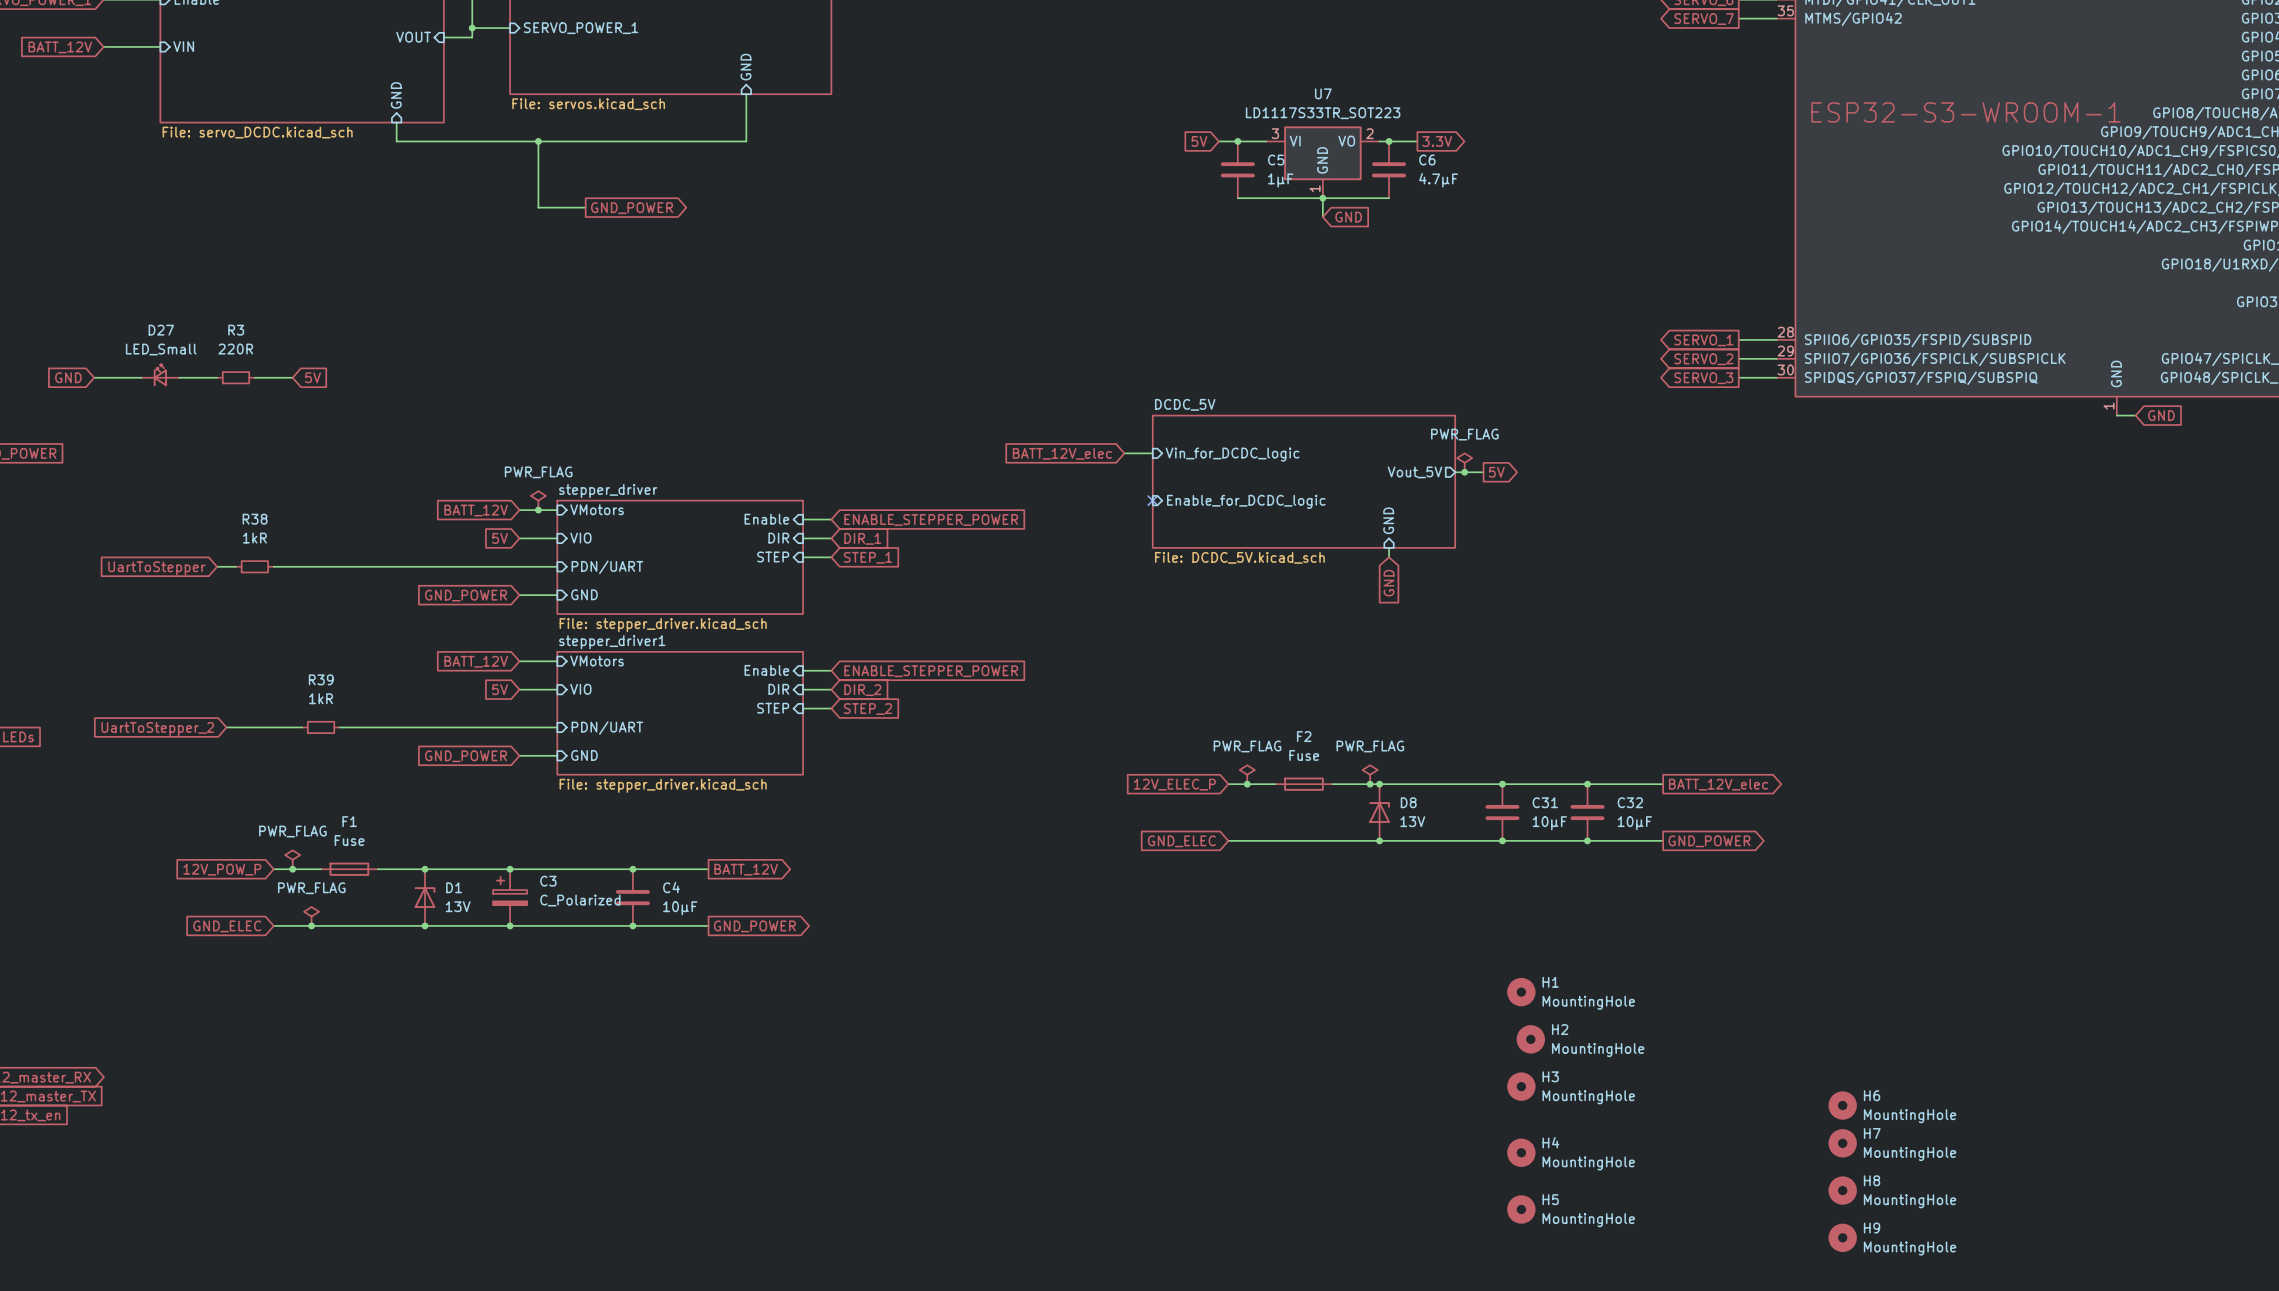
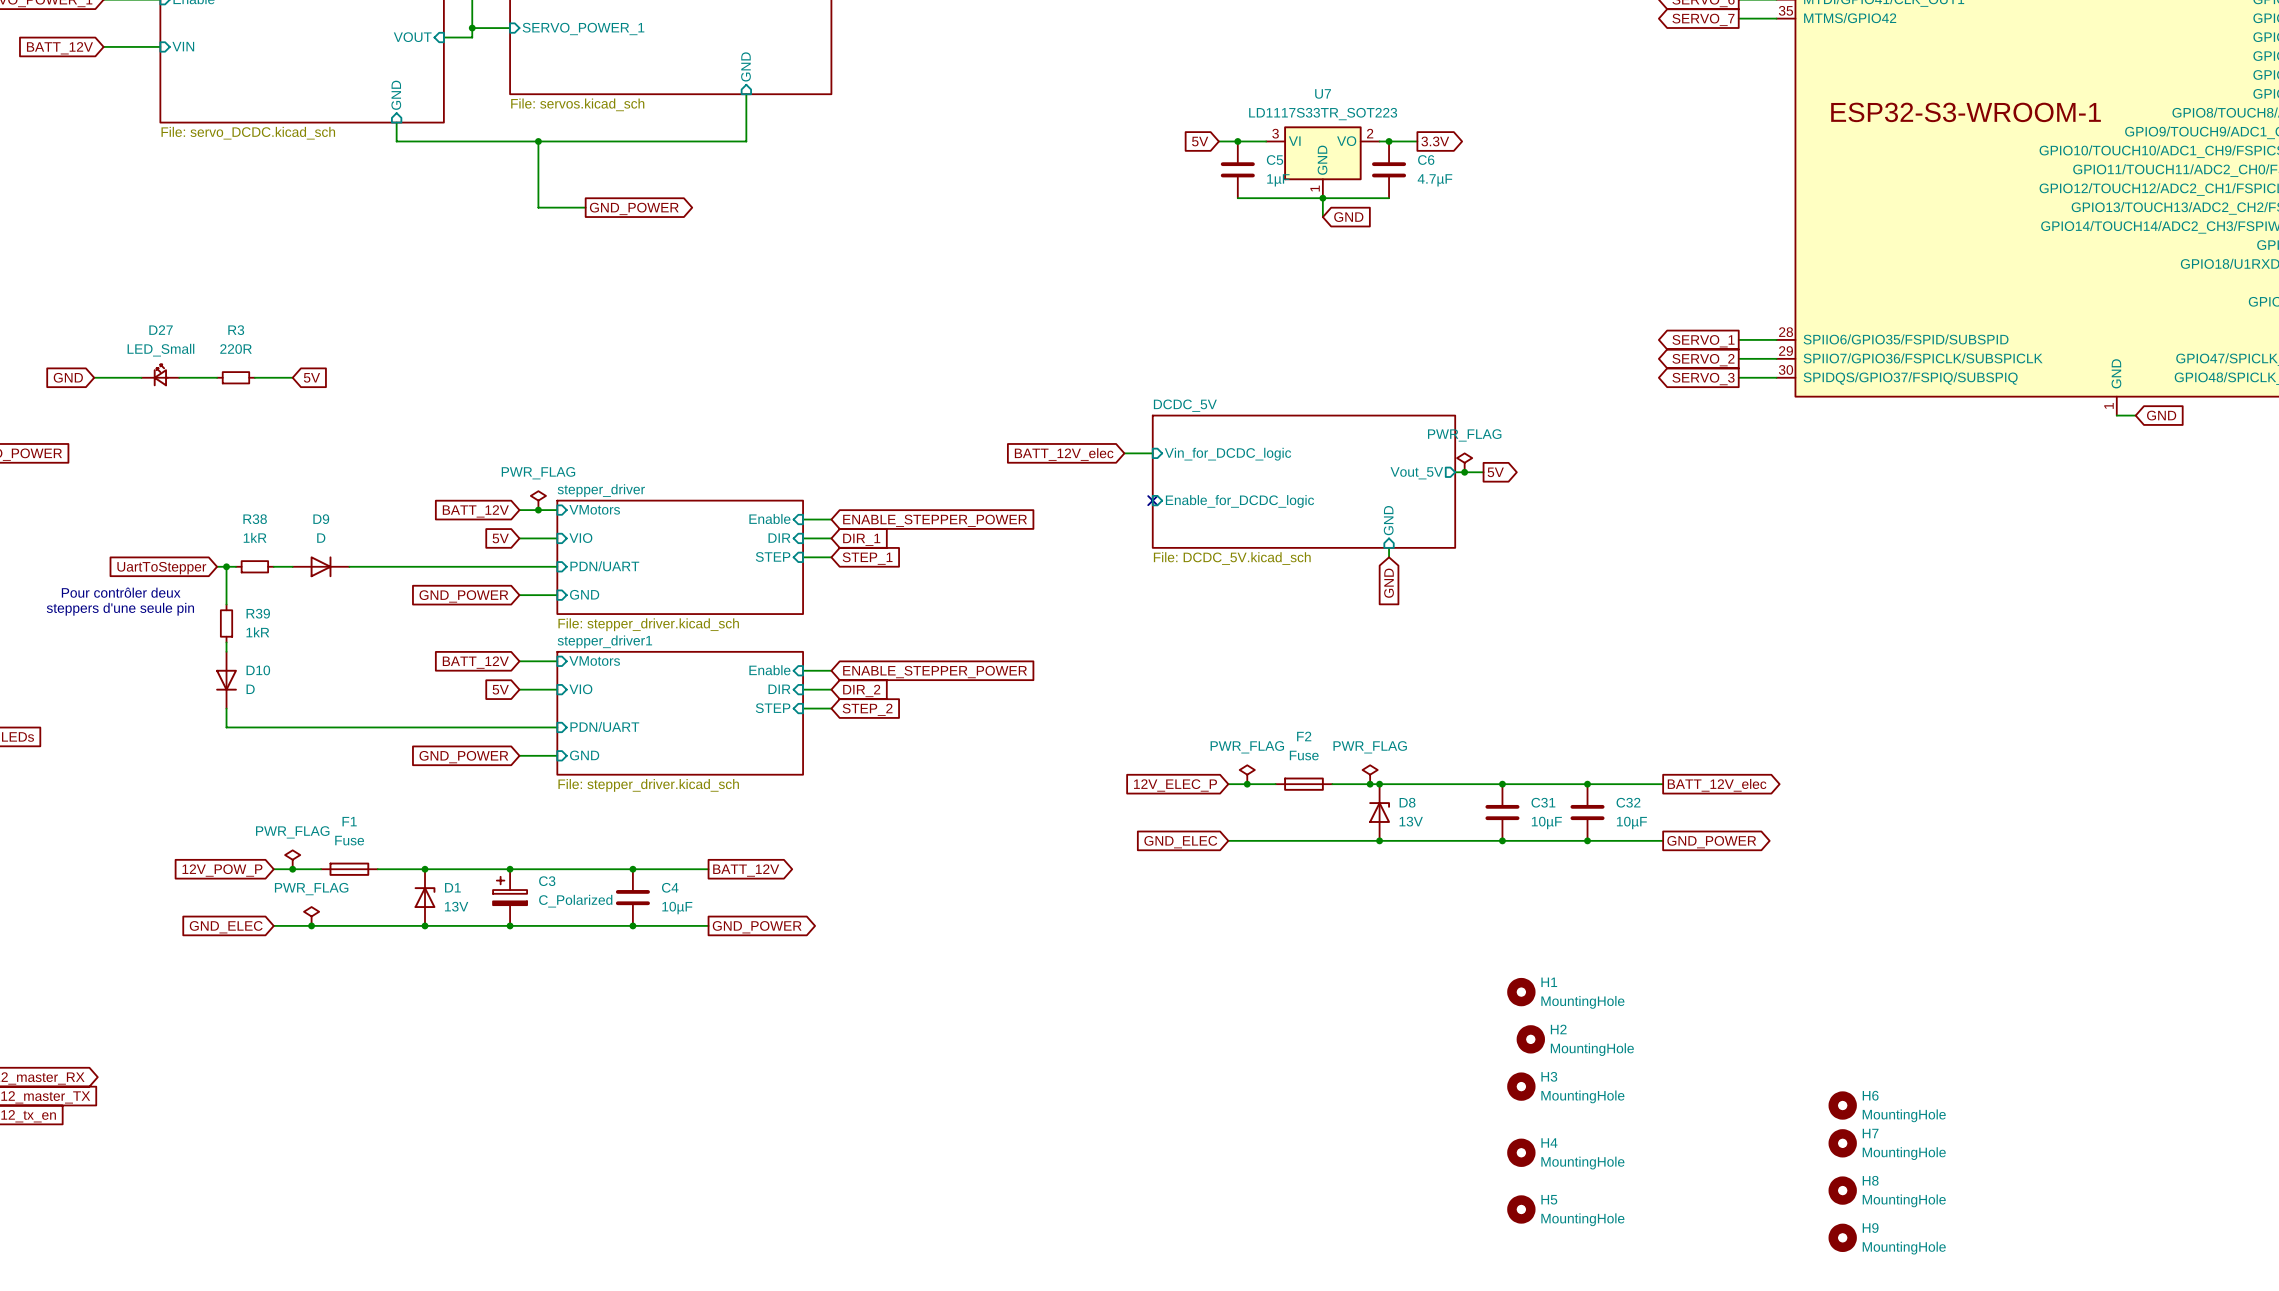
wire: none -> (226, 566) (226, 604)
junction: none -> (226, 566)
D9: none -> D (321, 566)
text: none -> Pour contrôler deux (121, 592)
text: none -> steppers d'une seule pin (120, 609)
wire: none -> (226, 642) (226, 651)
R39 name position: R39 (321, 679) -> R39 (258, 613)
D10: none -> D (226, 680)
wire: none -> (226, 708) (226, 727)
wire: none -> (302, 727) (339, 727)
R39 rotation: 0° (321, 727) -> 90° clockwise (226, 623)
R39 position: (321, 727) -> (226, 623)
global label: UartToStepper_2 (157, 729) -> none

